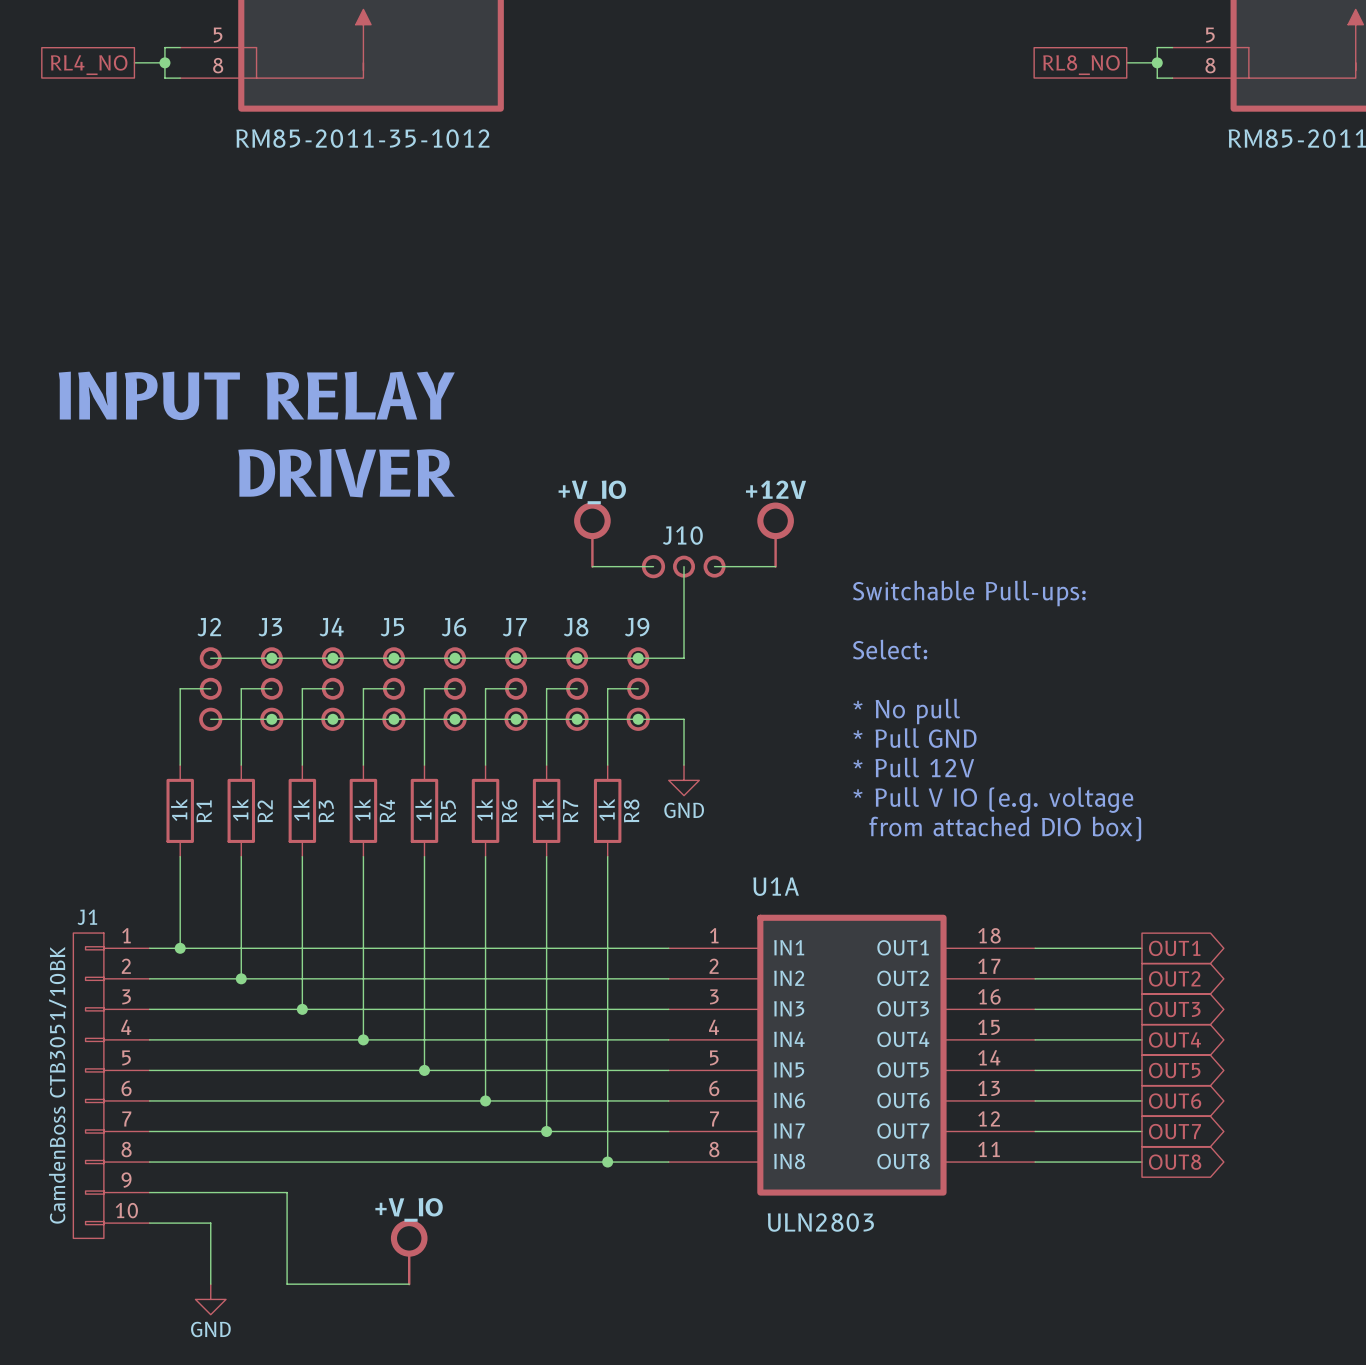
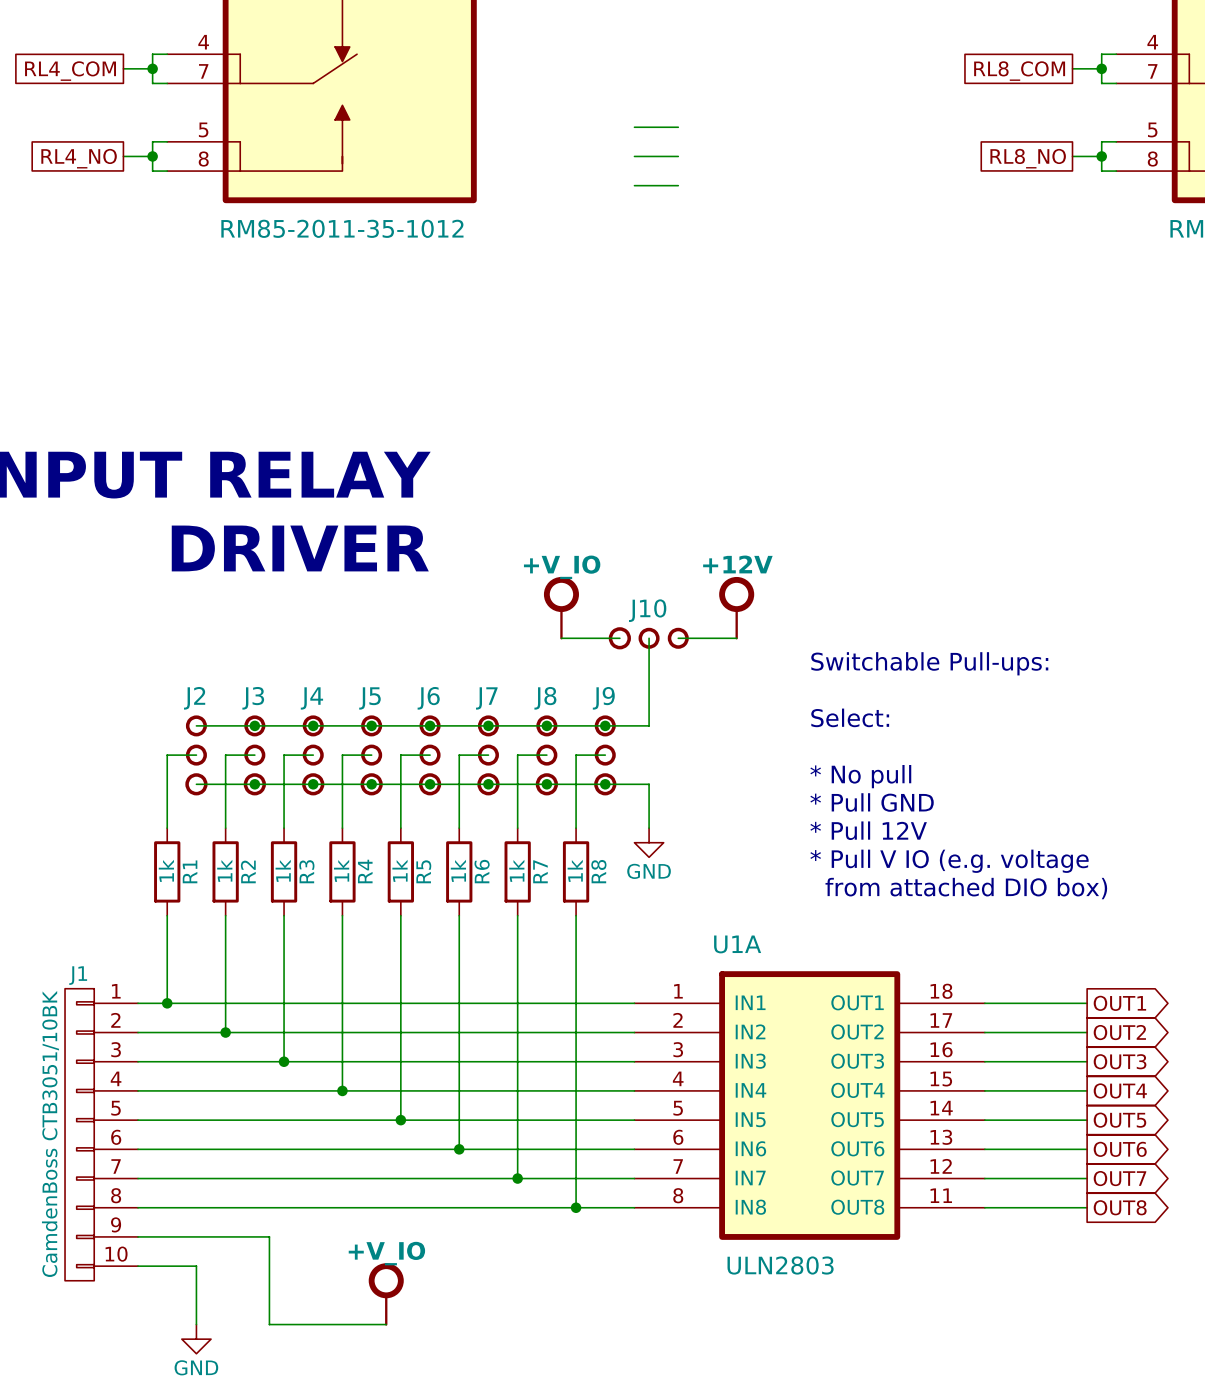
wire: none -> (634, 127) (678, 127)
wire: none -> (634, 156) (678, 156)
wire: none -> (634, 185) (678, 185)

